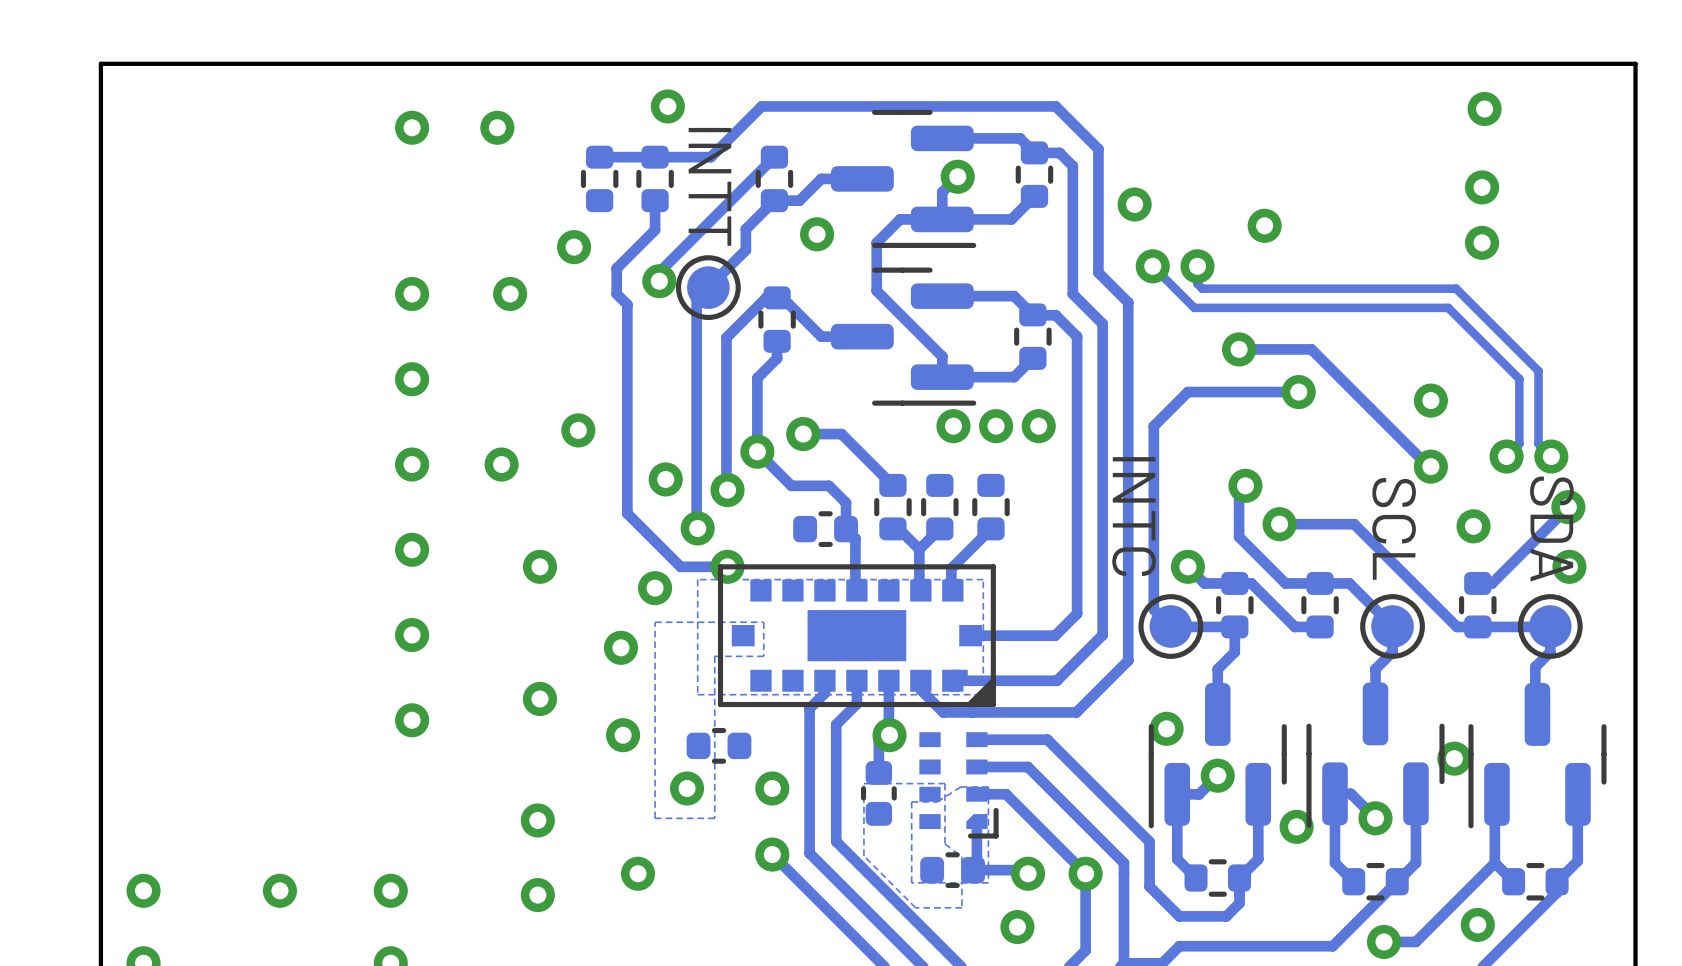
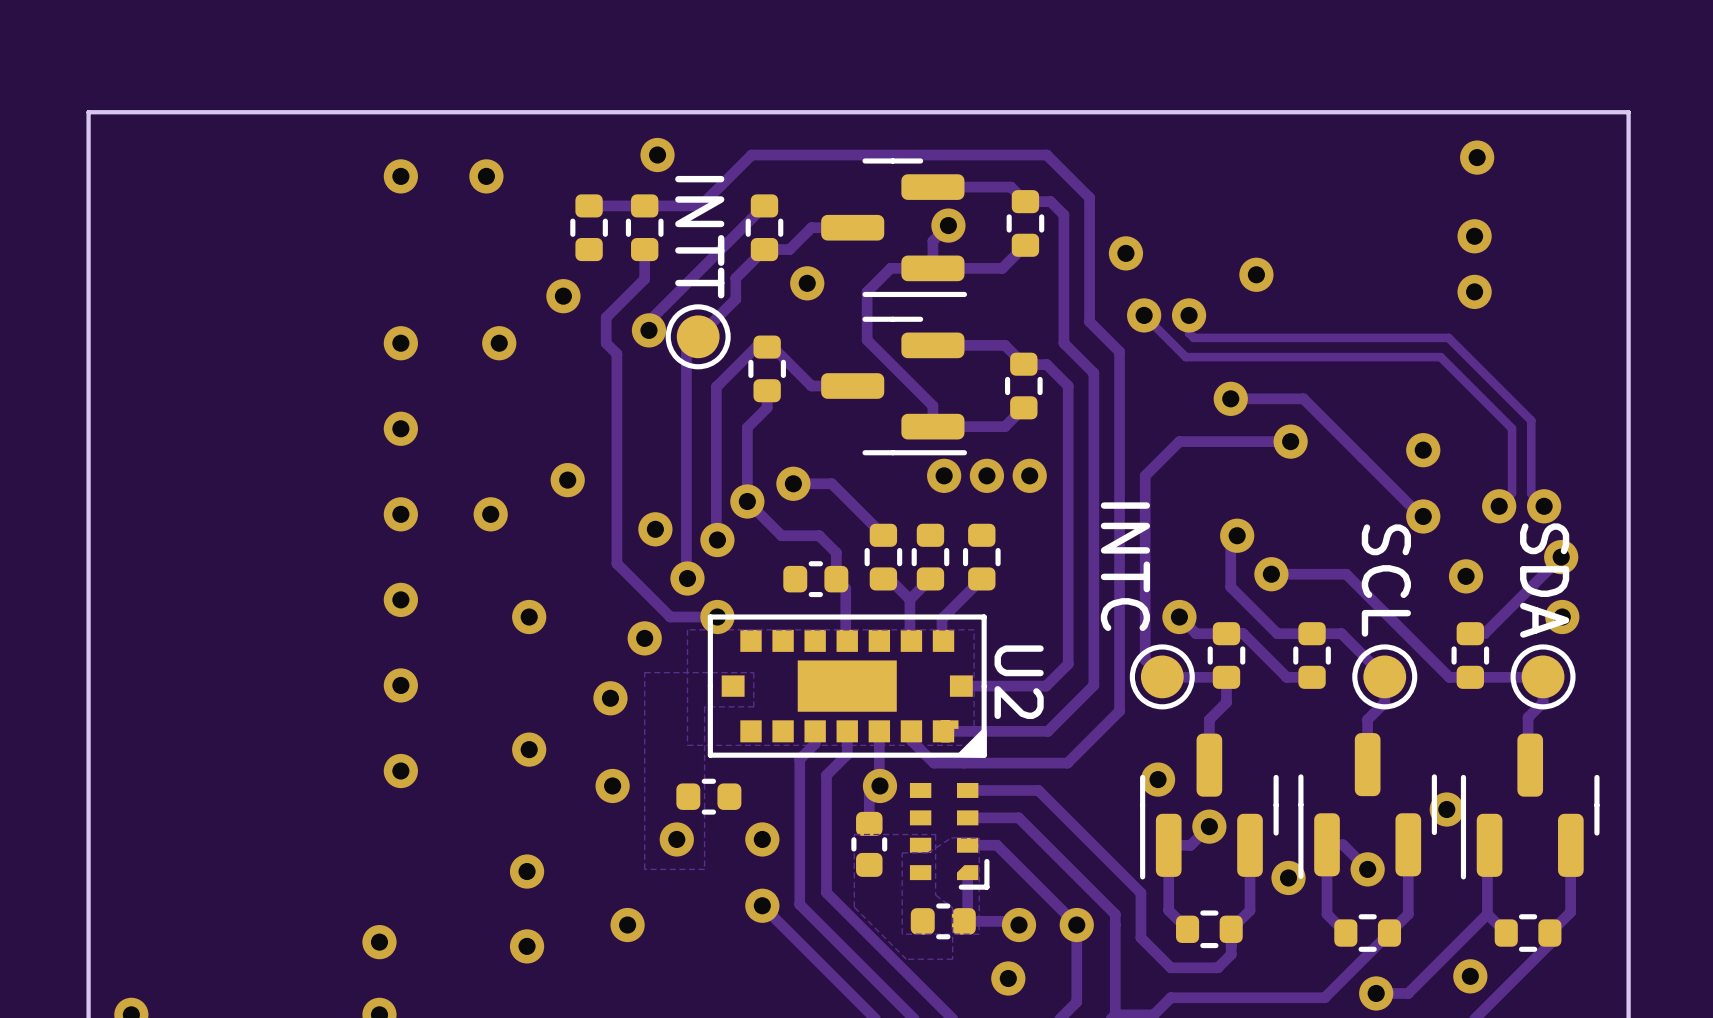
U2 name: none -> U2 (1019, 682)
via: (143, 890) -> none
via: (279, 890) -> none

